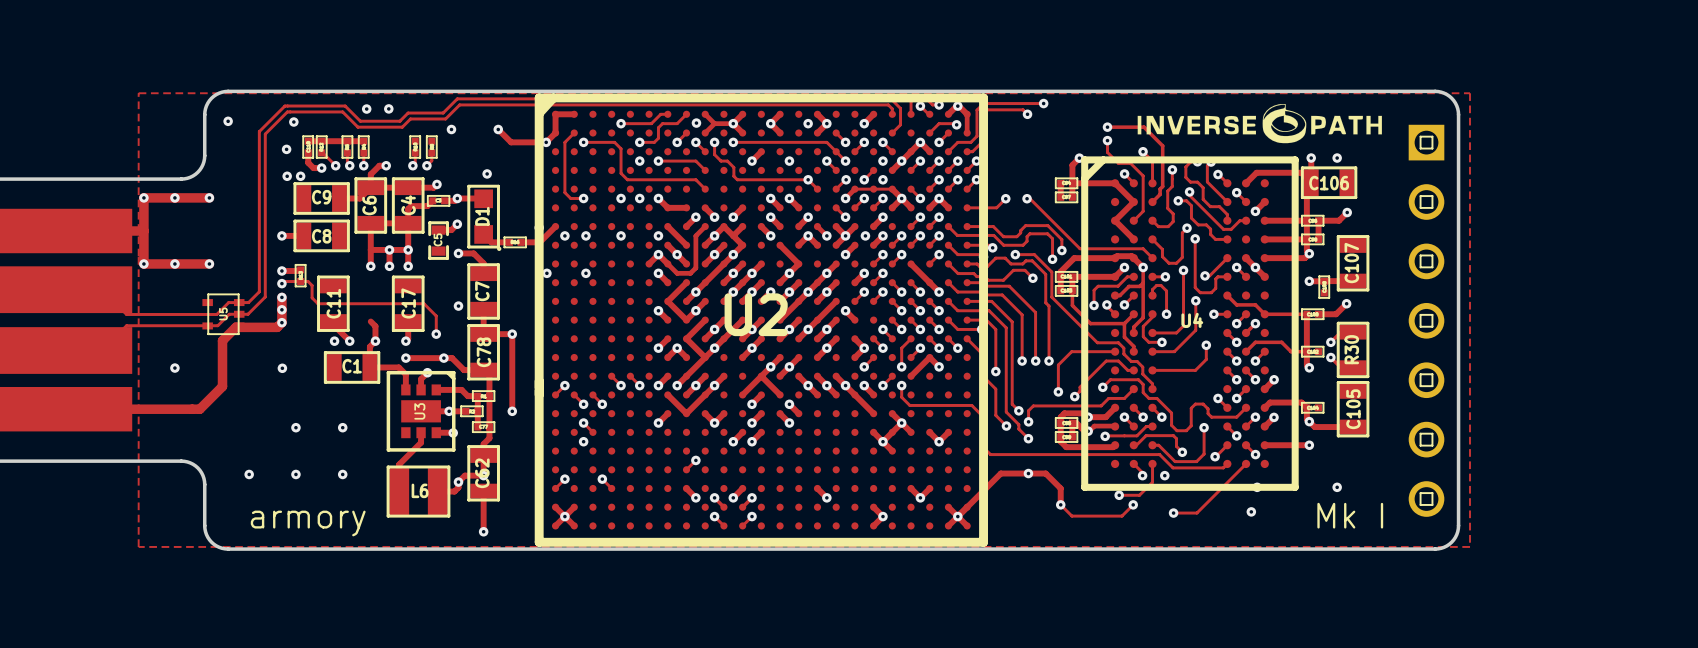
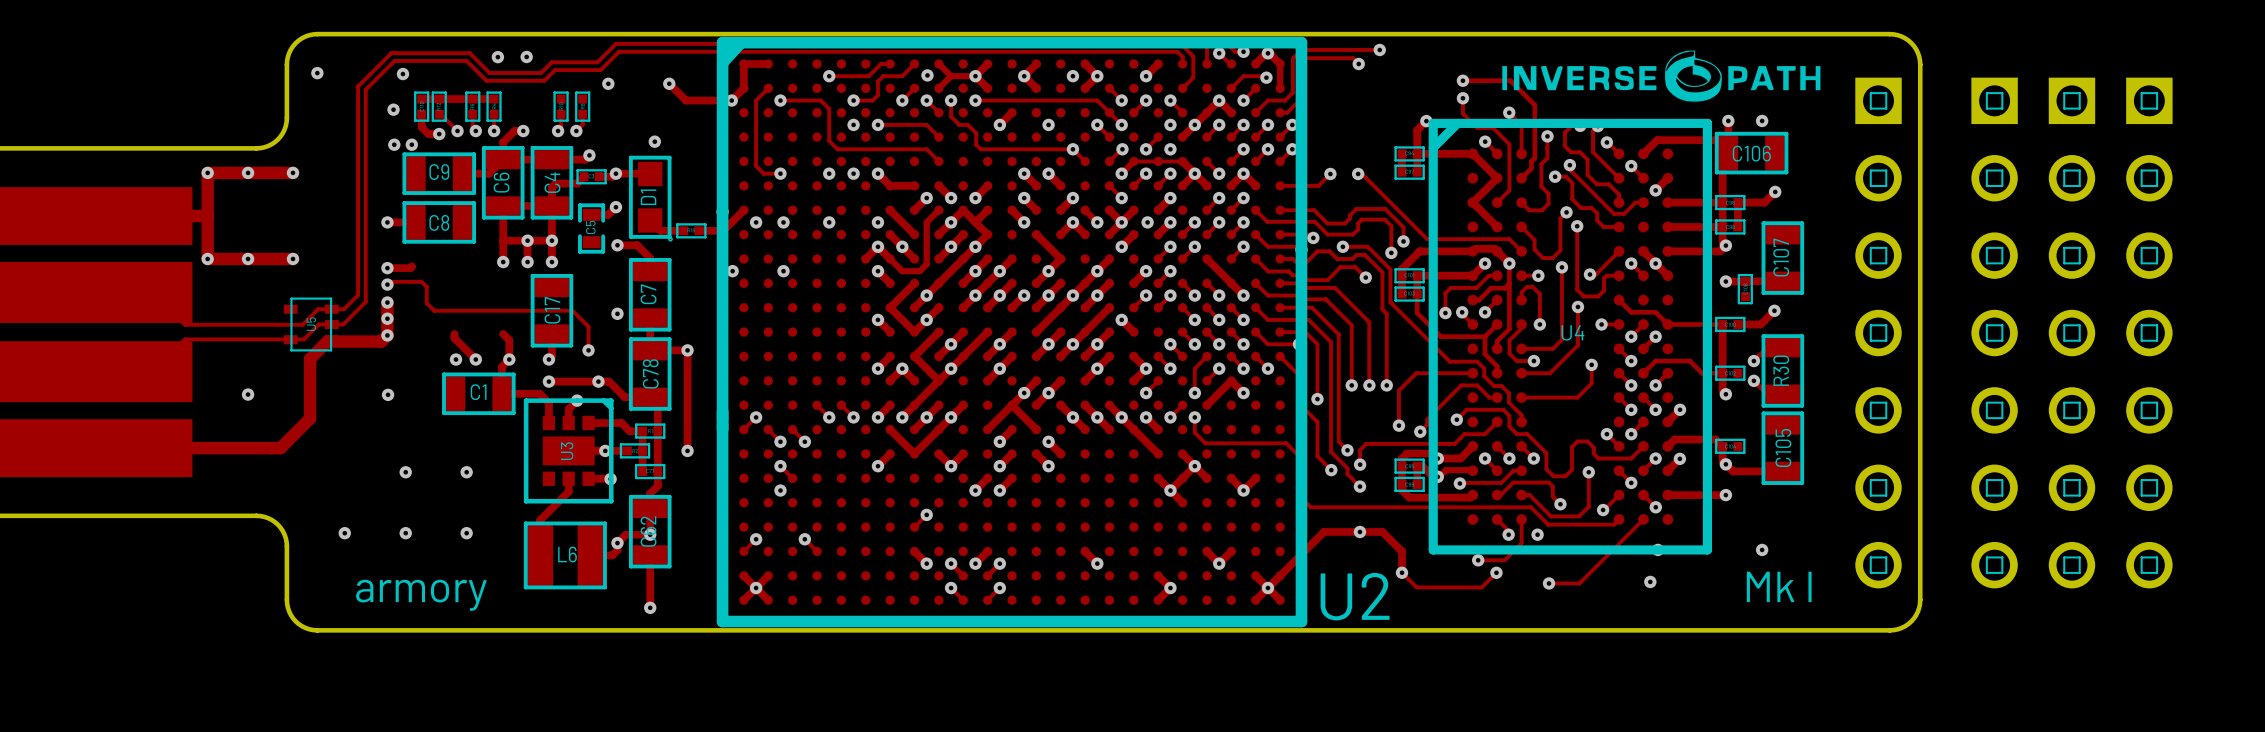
zone outline: (138, 93) (138, 546) (1470, 546) (1470, 93) (138, 93) -> none
part: (300, 275) -> none
C11: (333, 303) -> none
U2 name position: U2 (756, 314) -> U2 (1355, 596)
part: none -> (1994, 333)
part: none -> (2071, 333)
part: none -> (2149, 333)

